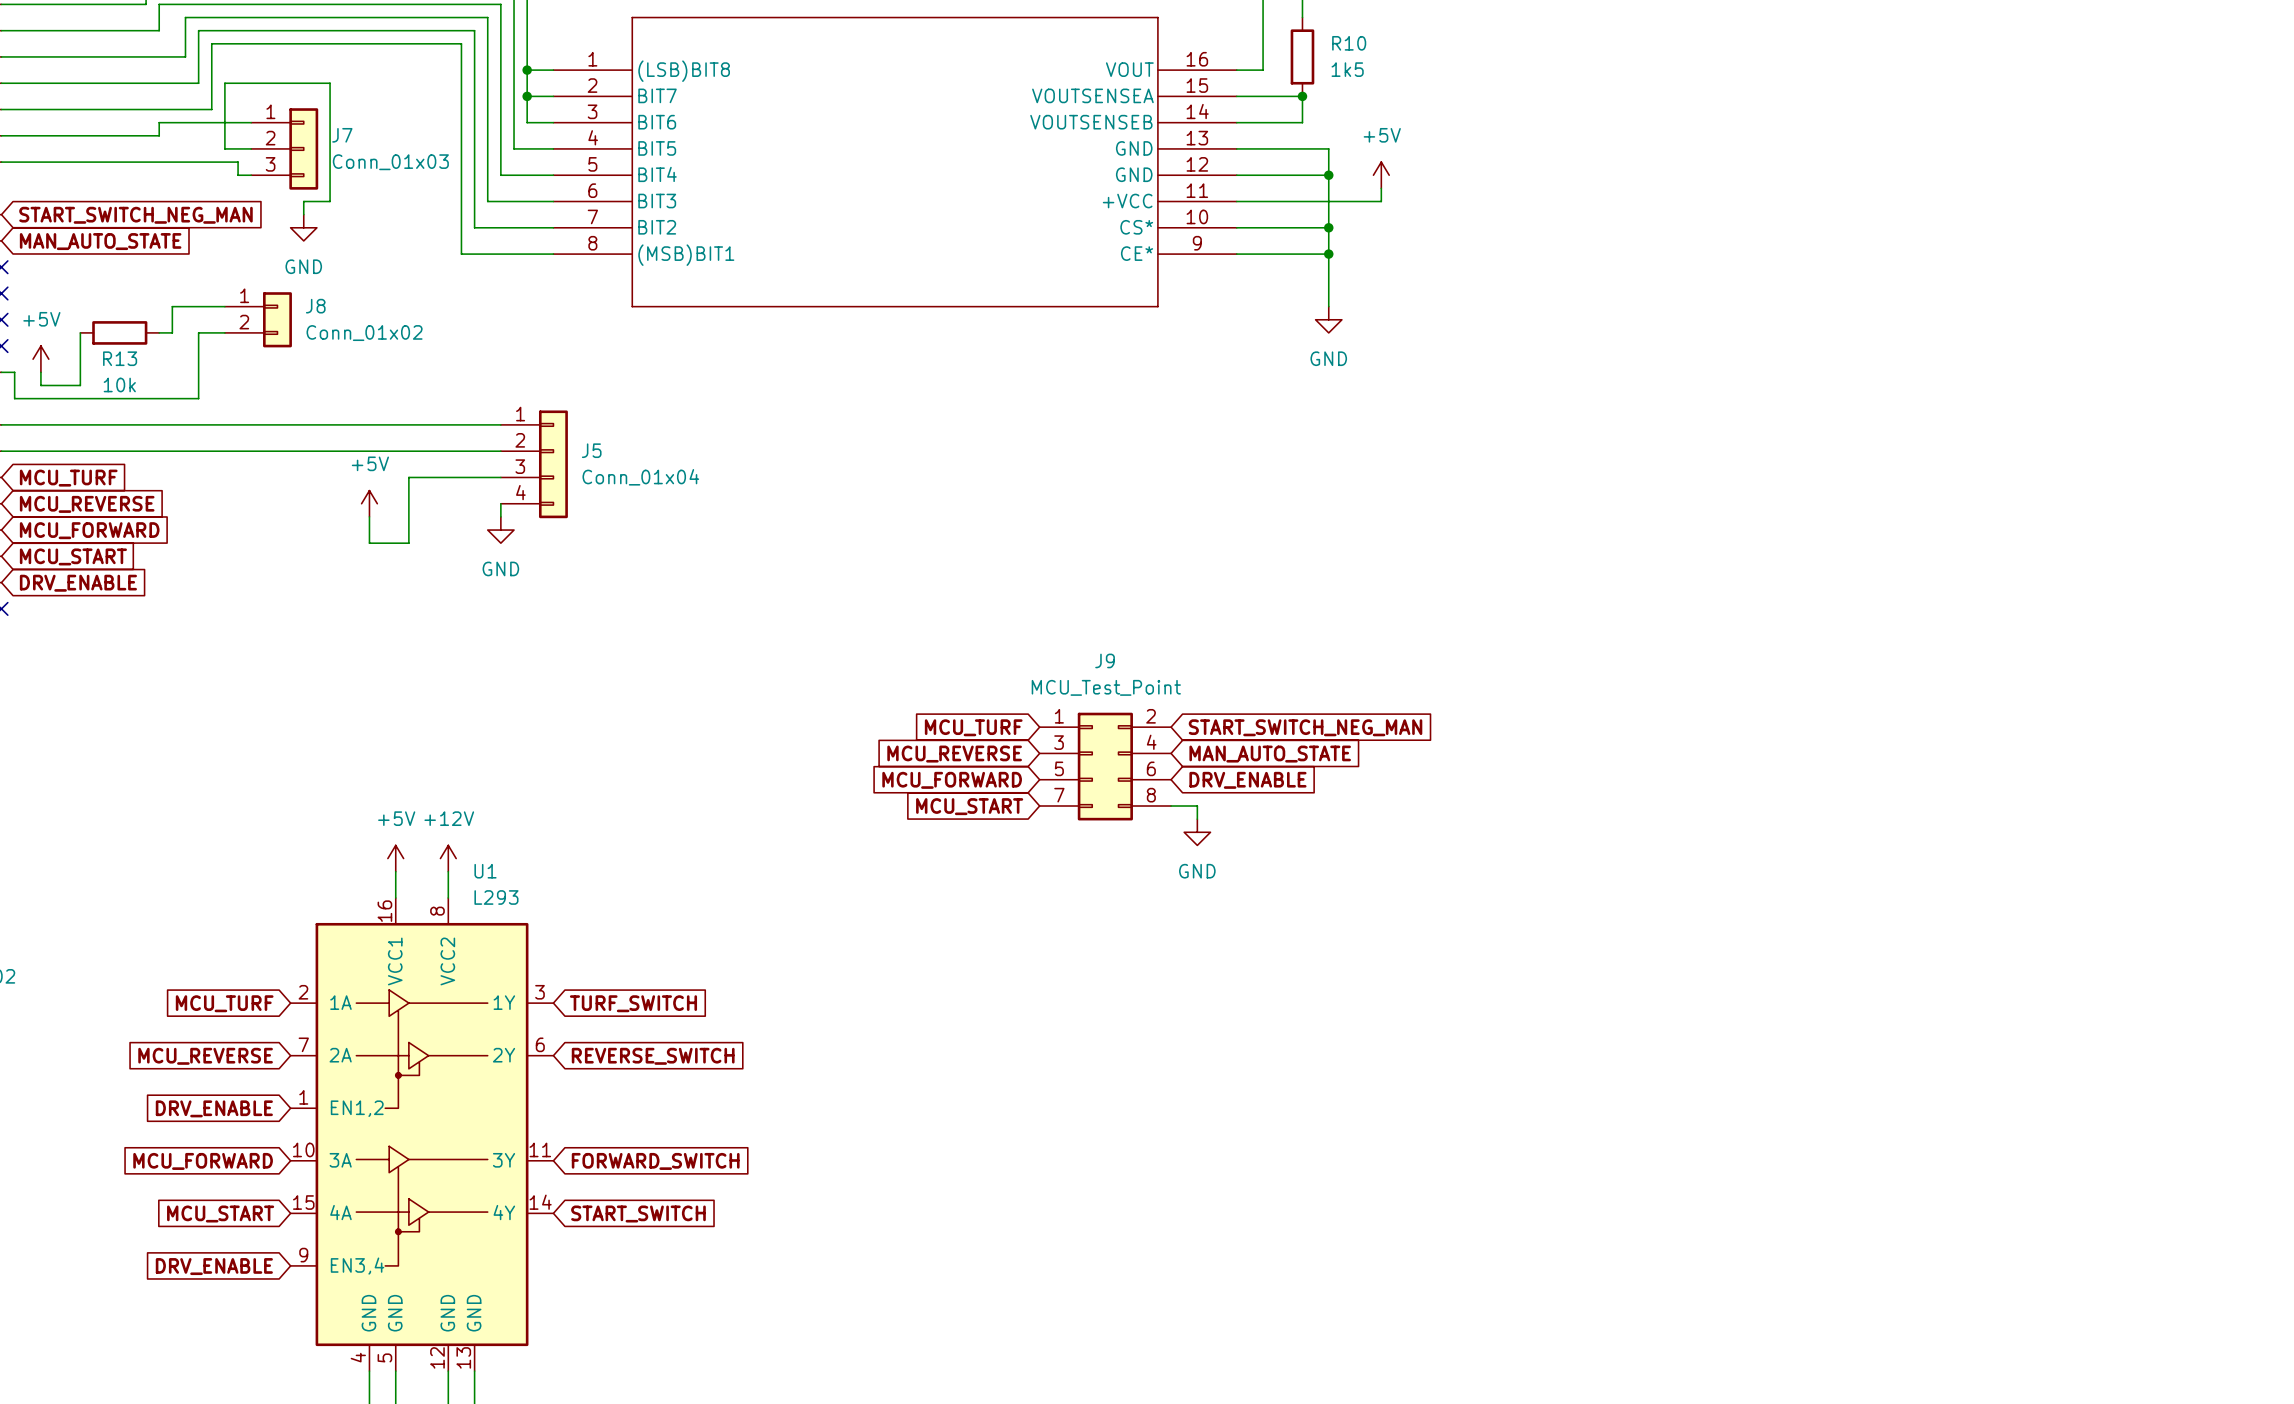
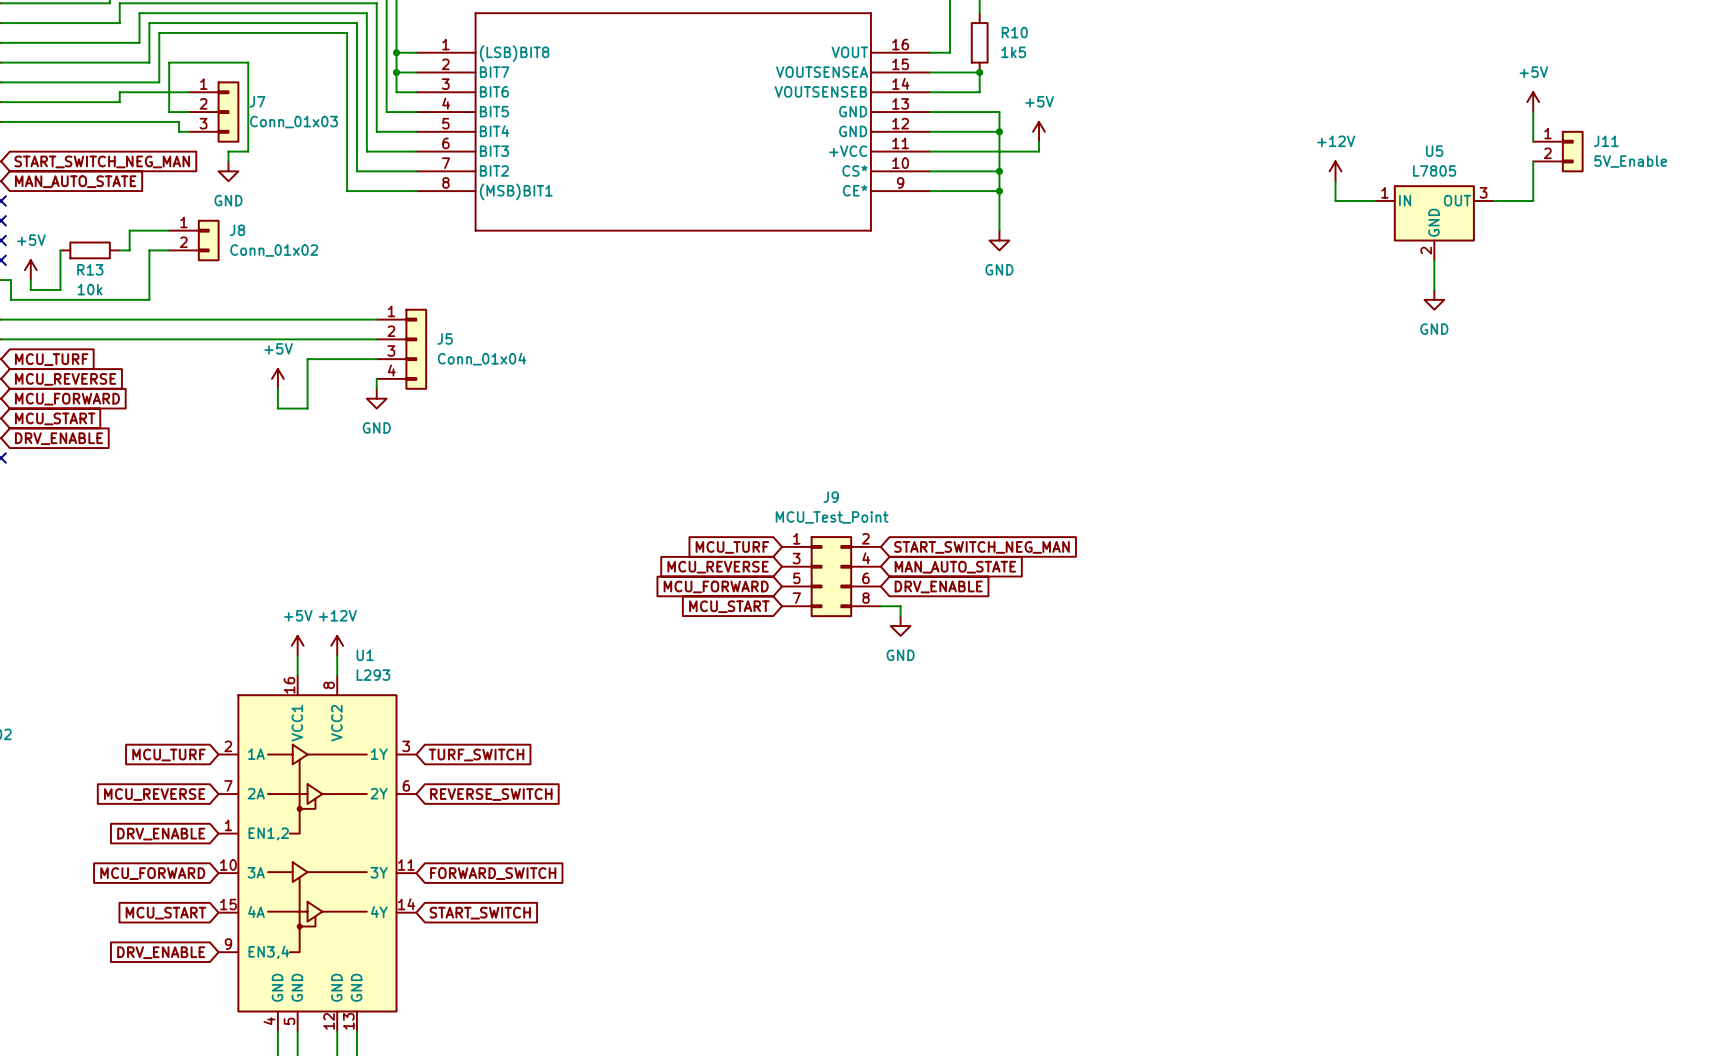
power symbol: none -> +5V (1533, 102)
wire: none -> (1533, 112) (1533, 141)
J11: none -> 5V_Enable (1558, 151)
wire: none -> (1533, 161) (1533, 200) (1493, 200)
power symbol: none -> +12V (1335, 171)
wire: none -> (1335, 181) (1335, 200) (1375, 200)
U5: none -> L7805 (1434, 222)
wire: none -> (1434, 260) (1434, 289)
power symbol: none -> GND (1434, 299)

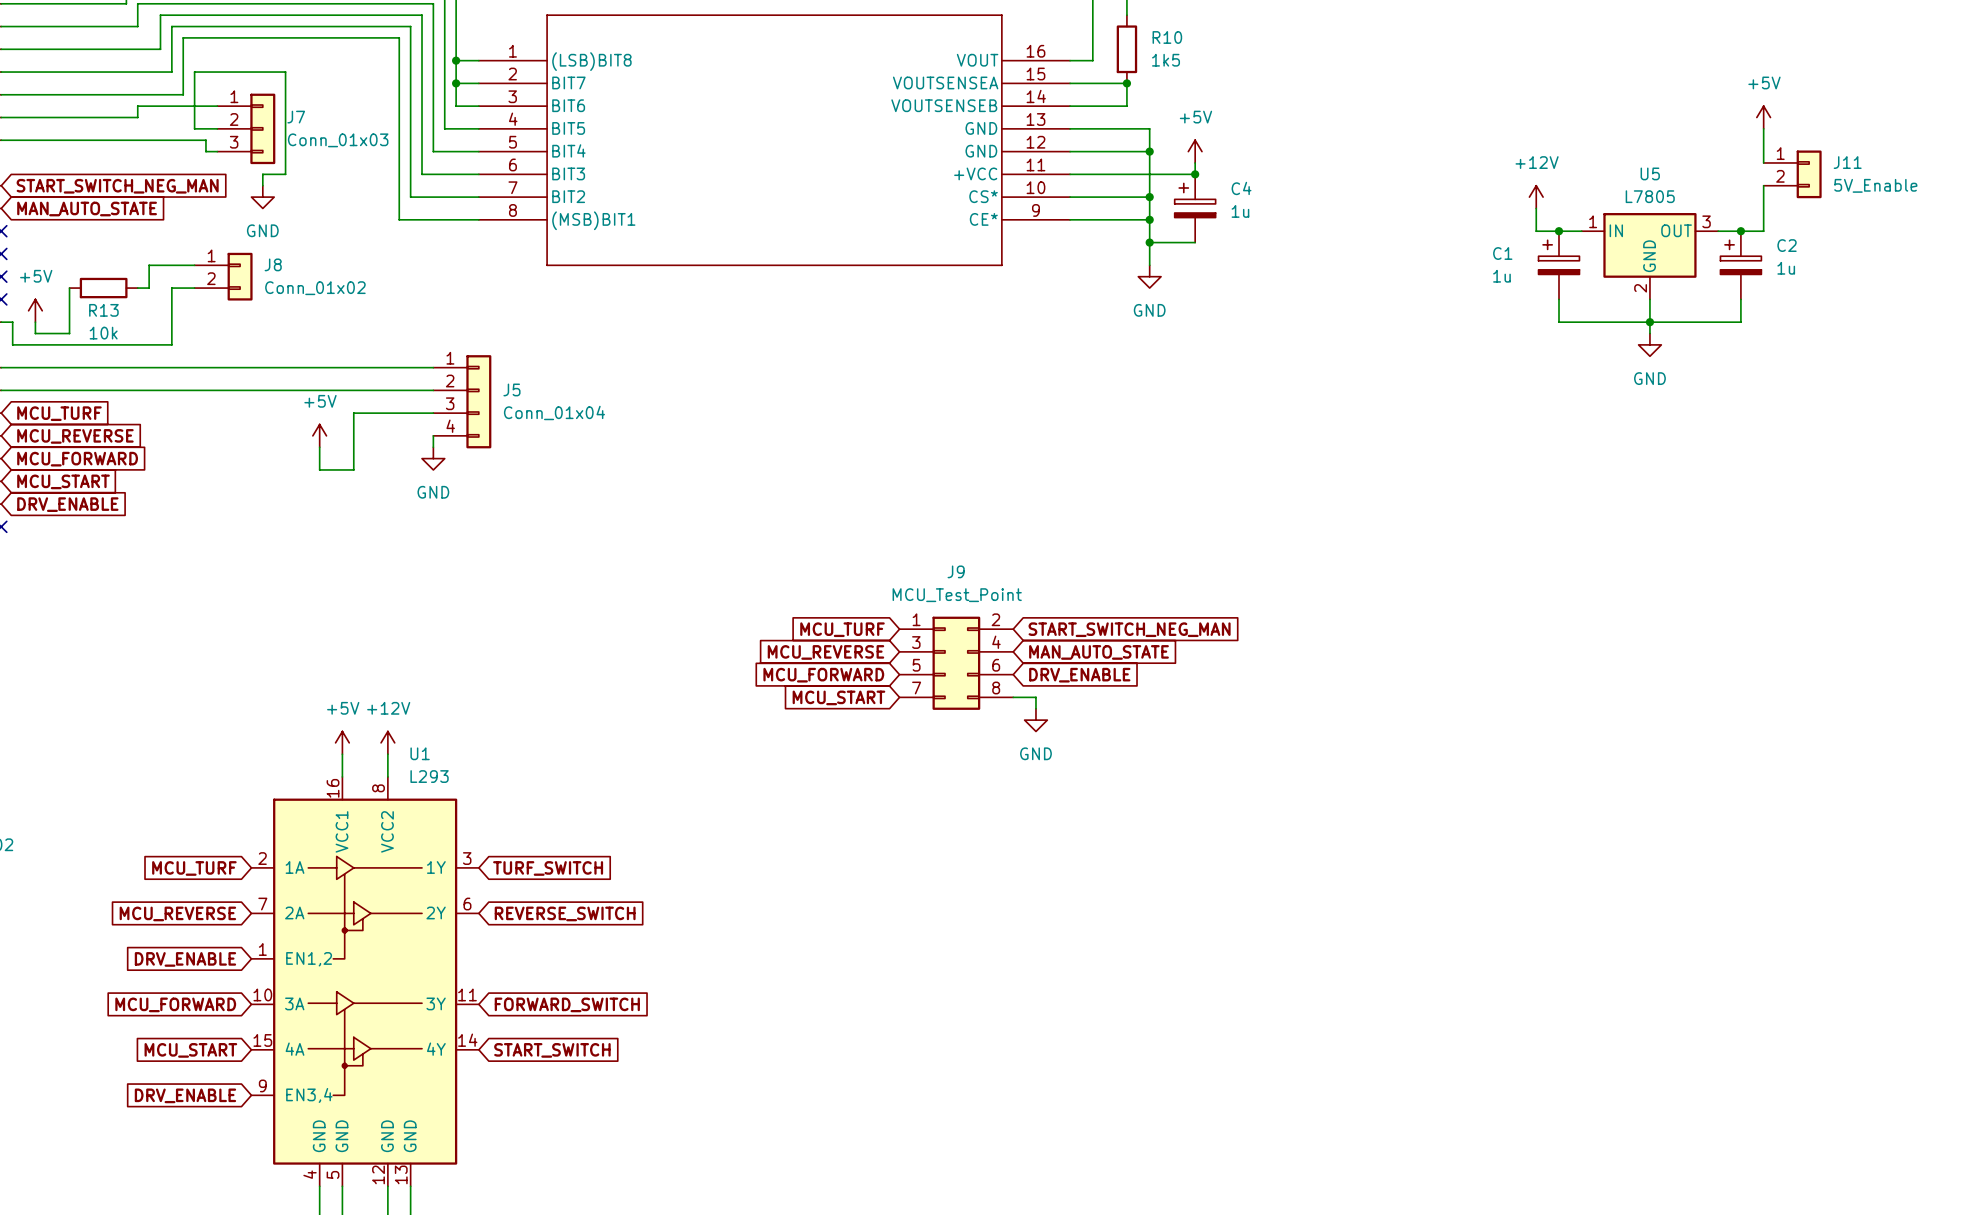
junction: none -> (1195, 174)
C4: none -> 1u (1195, 208)
junction: none -> (1559, 231)
junction: none -> (1740, 231)
wire: none -> (1149, 242) (1195, 242)
junction: none -> (1149, 242)
C1: none -> 1u (1559, 265)
C2: none -> 1u (1740, 265)
wire: none -> (1559, 299) (1559, 322) (1740, 322) (1740, 299)
junction: none -> (1649, 322)

